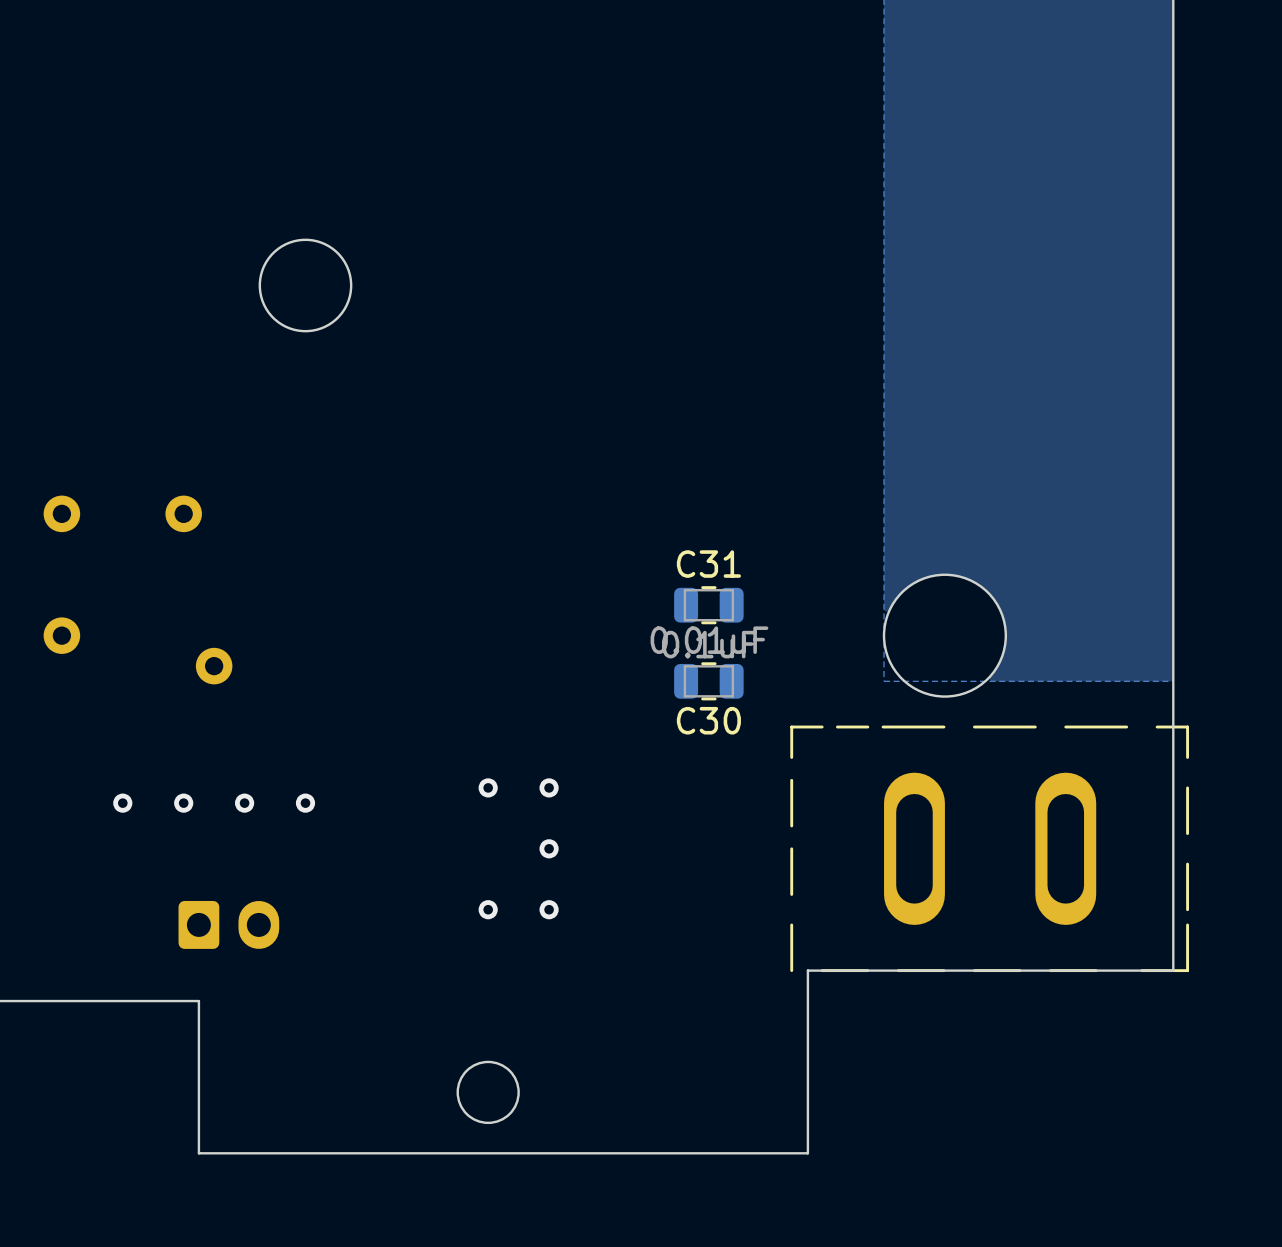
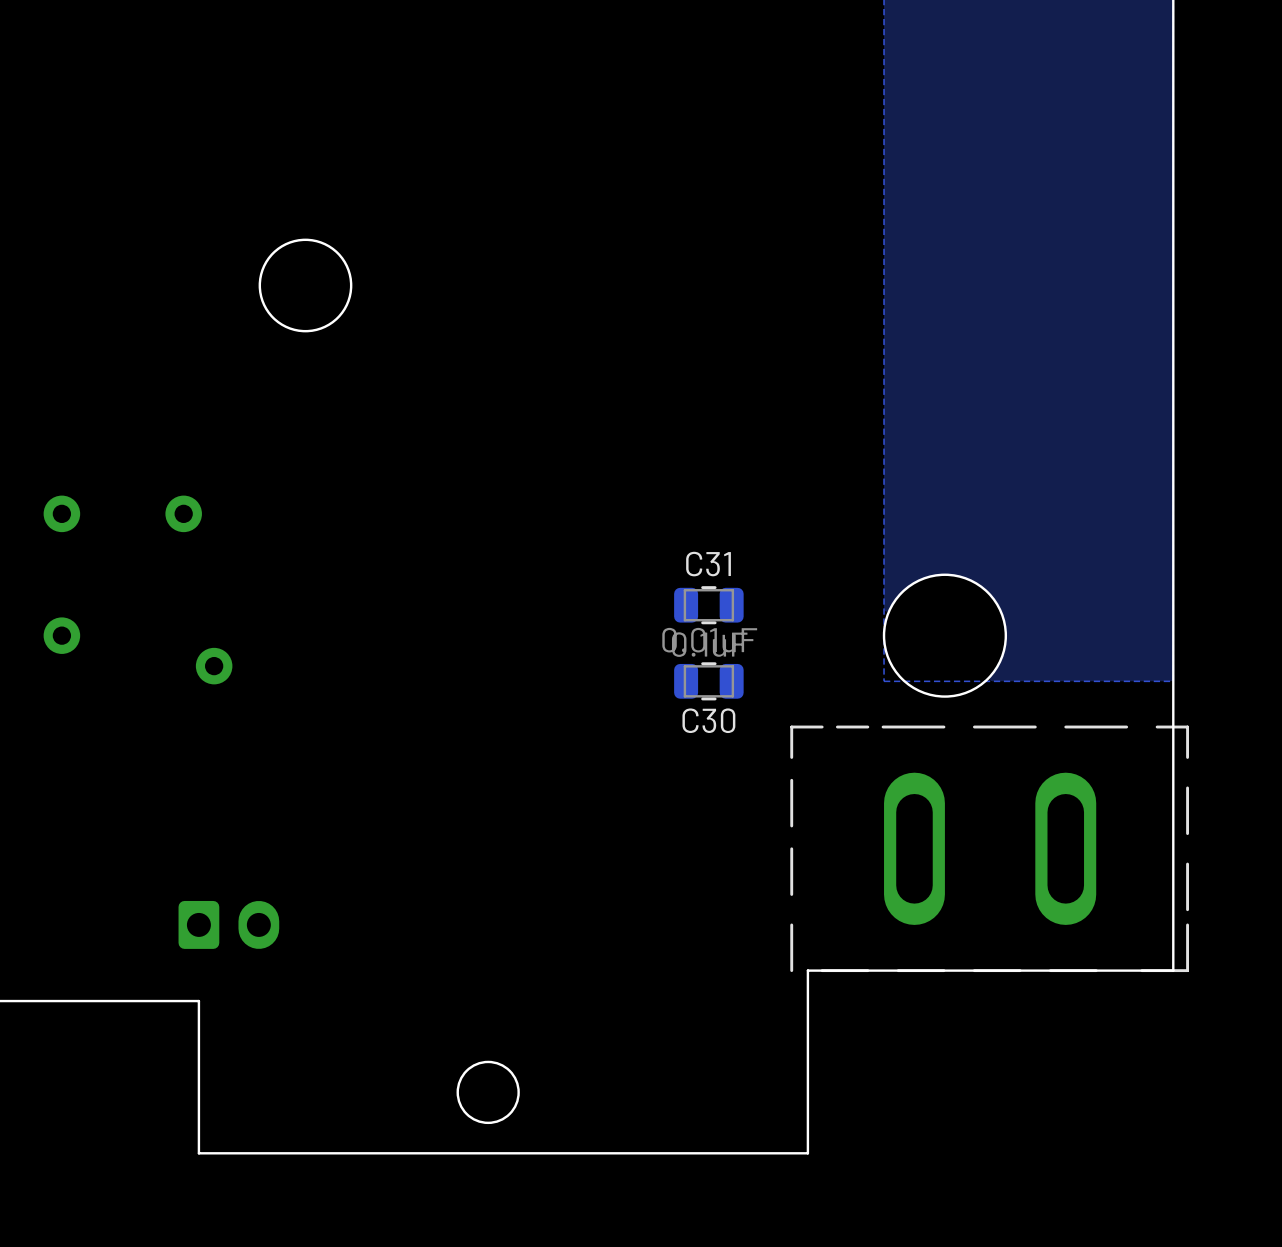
via: (488, 787) -> none
via: (549, 787) -> none
via: (122, 803) -> none
via: (183, 803) -> none
via: (244, 803) -> none
via: (305, 803) -> none
via: (549, 848) -> none
via: (488, 909) -> none
via: (549, 909) -> none

